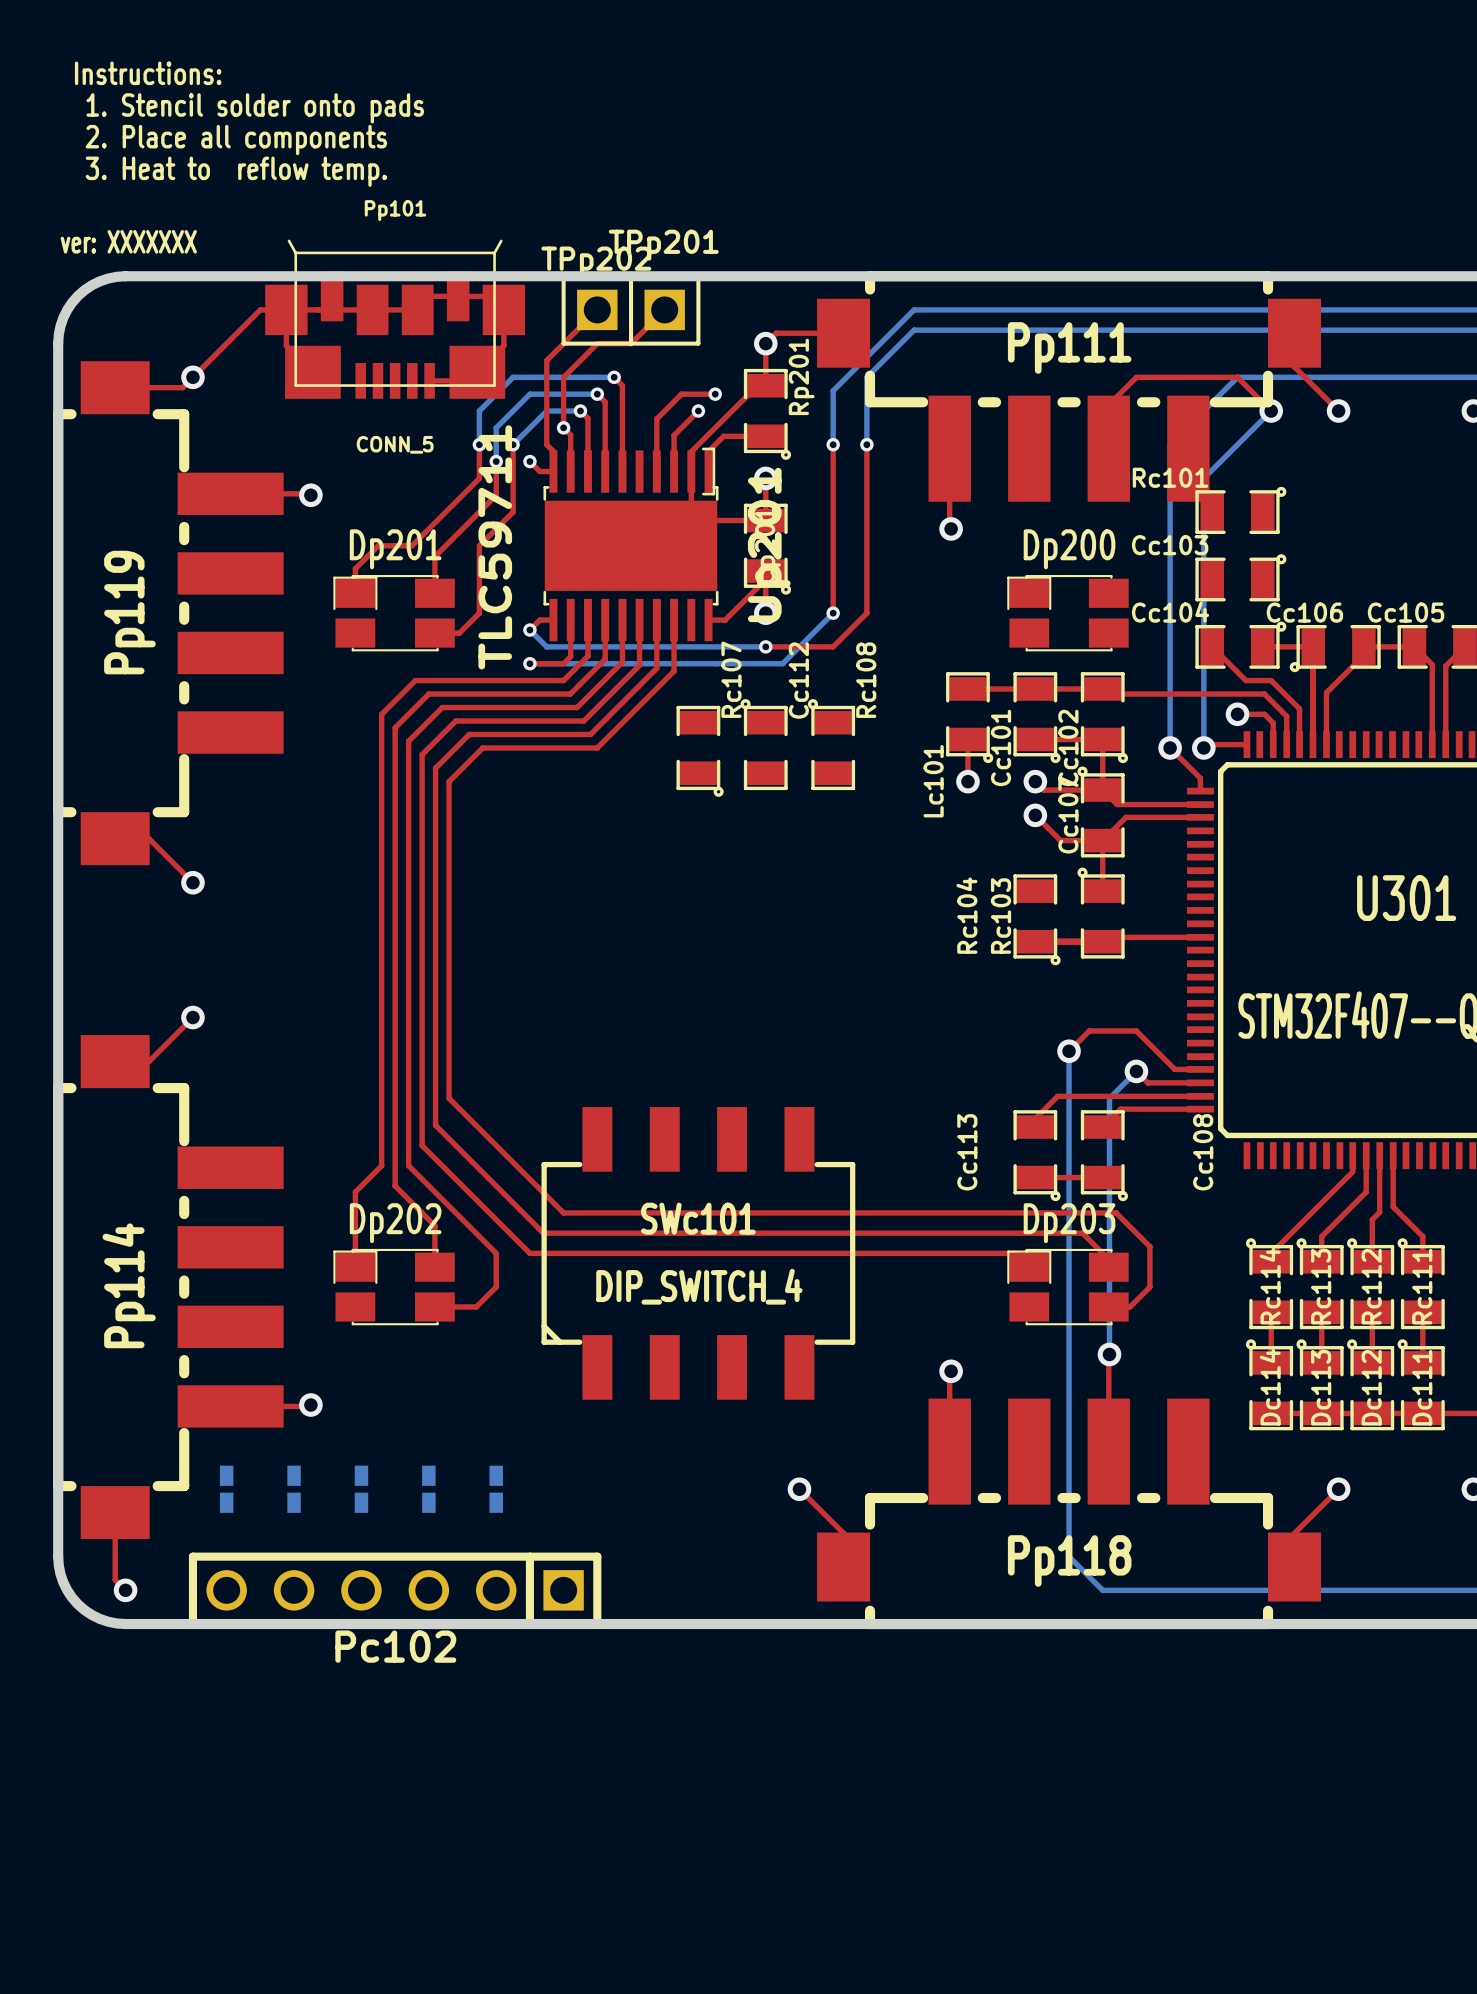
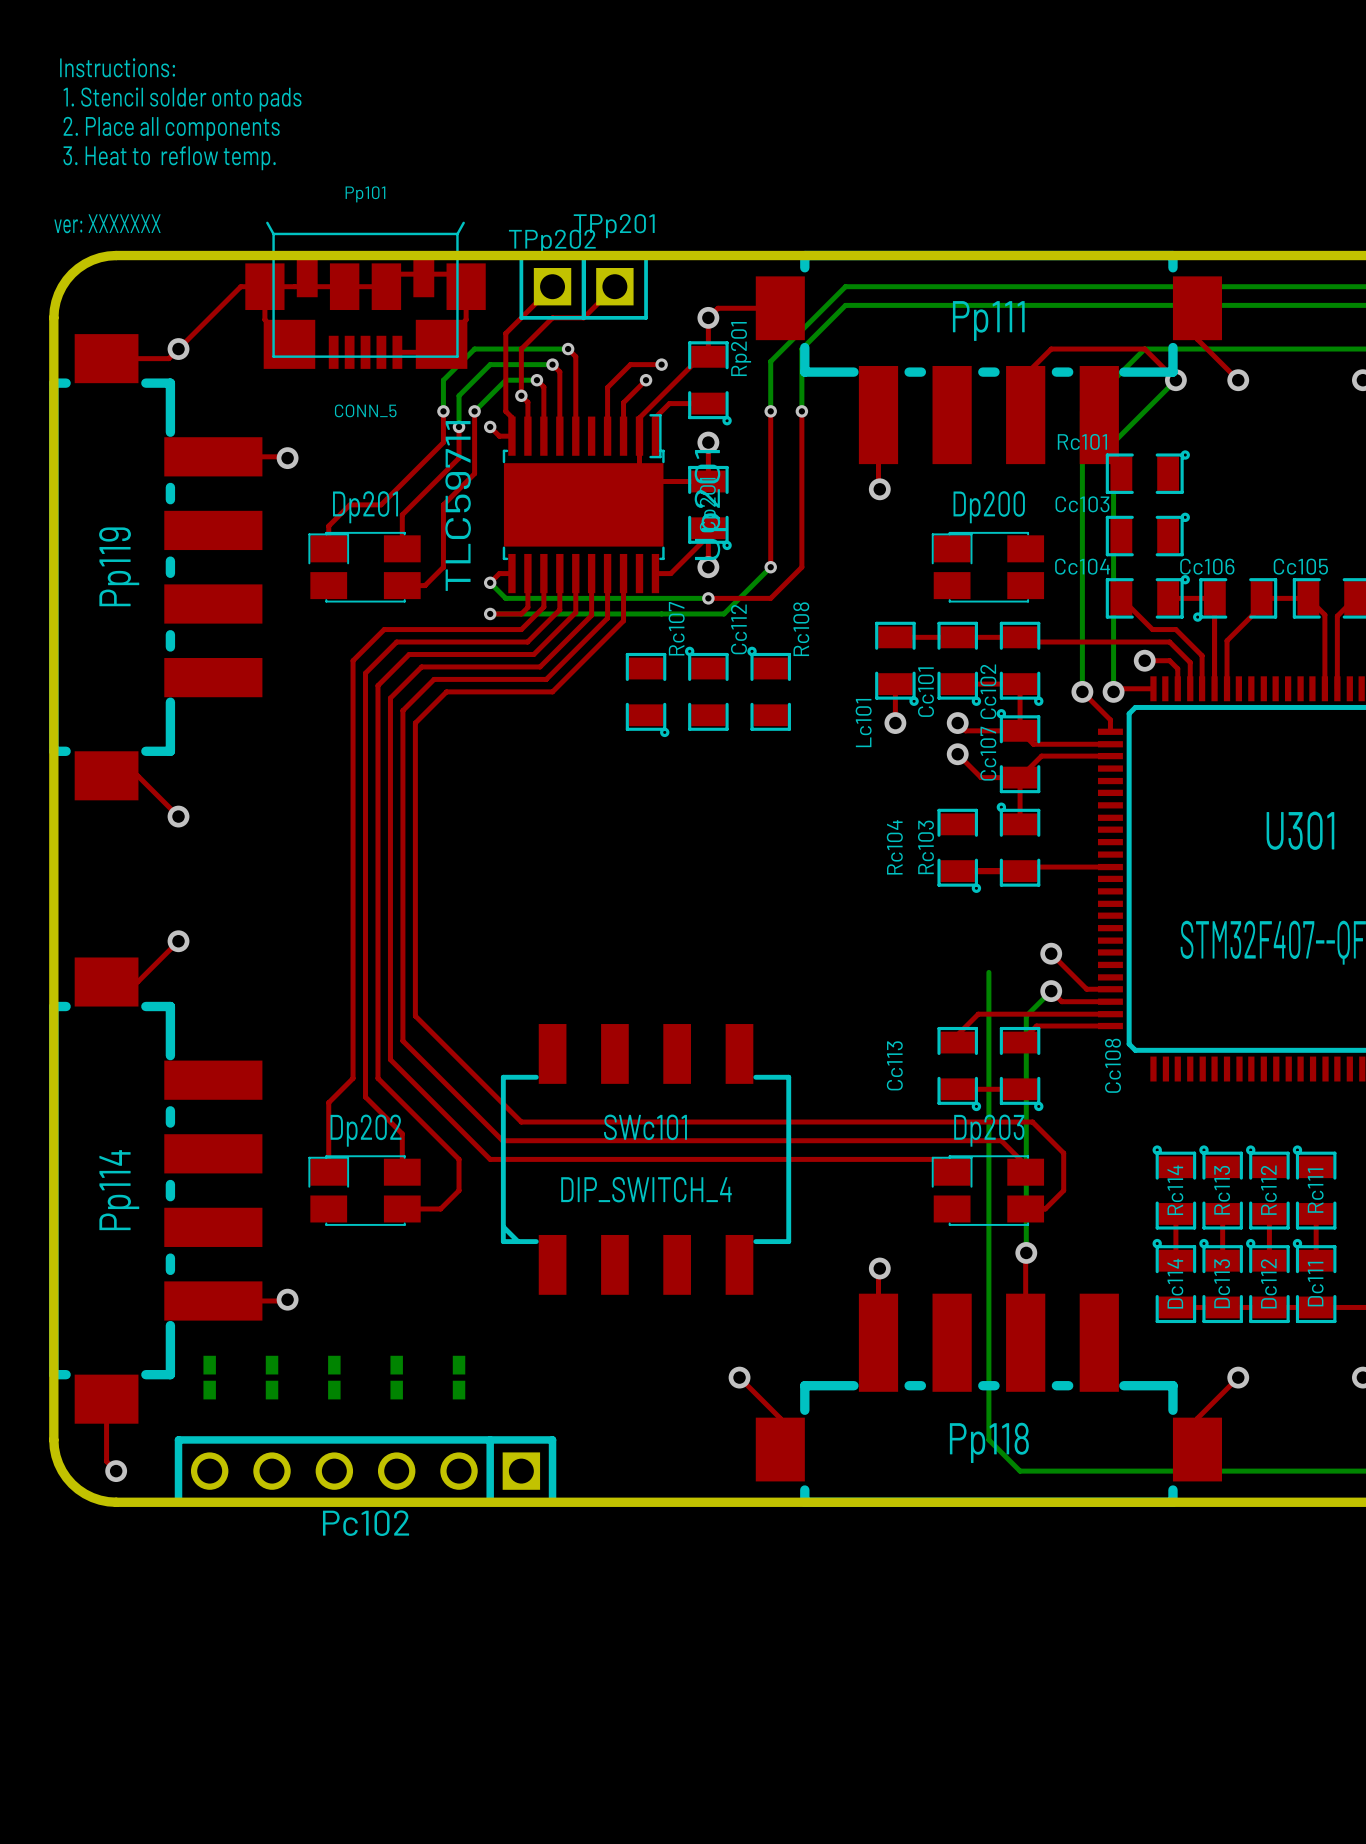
top track: (1136, 1031) (1089, 1031) (1069, 1051) -> none
via position: (1069, 1051) -> (1051, 953)
top track: (1352, 1155) (1352, 1171) (1271, 1253) (1271, 1261) -> none
top track: (1366, 1155) (1366, 1192) (1321, 1236) (1321, 1261) -> none
top track: (1379, 1155) (1379, 1212) (1372, 1219) (1372, 1261) -> none
top track: (1393, 1155) (1393, 1206) (1422, 1236) (1422, 1261) -> none

